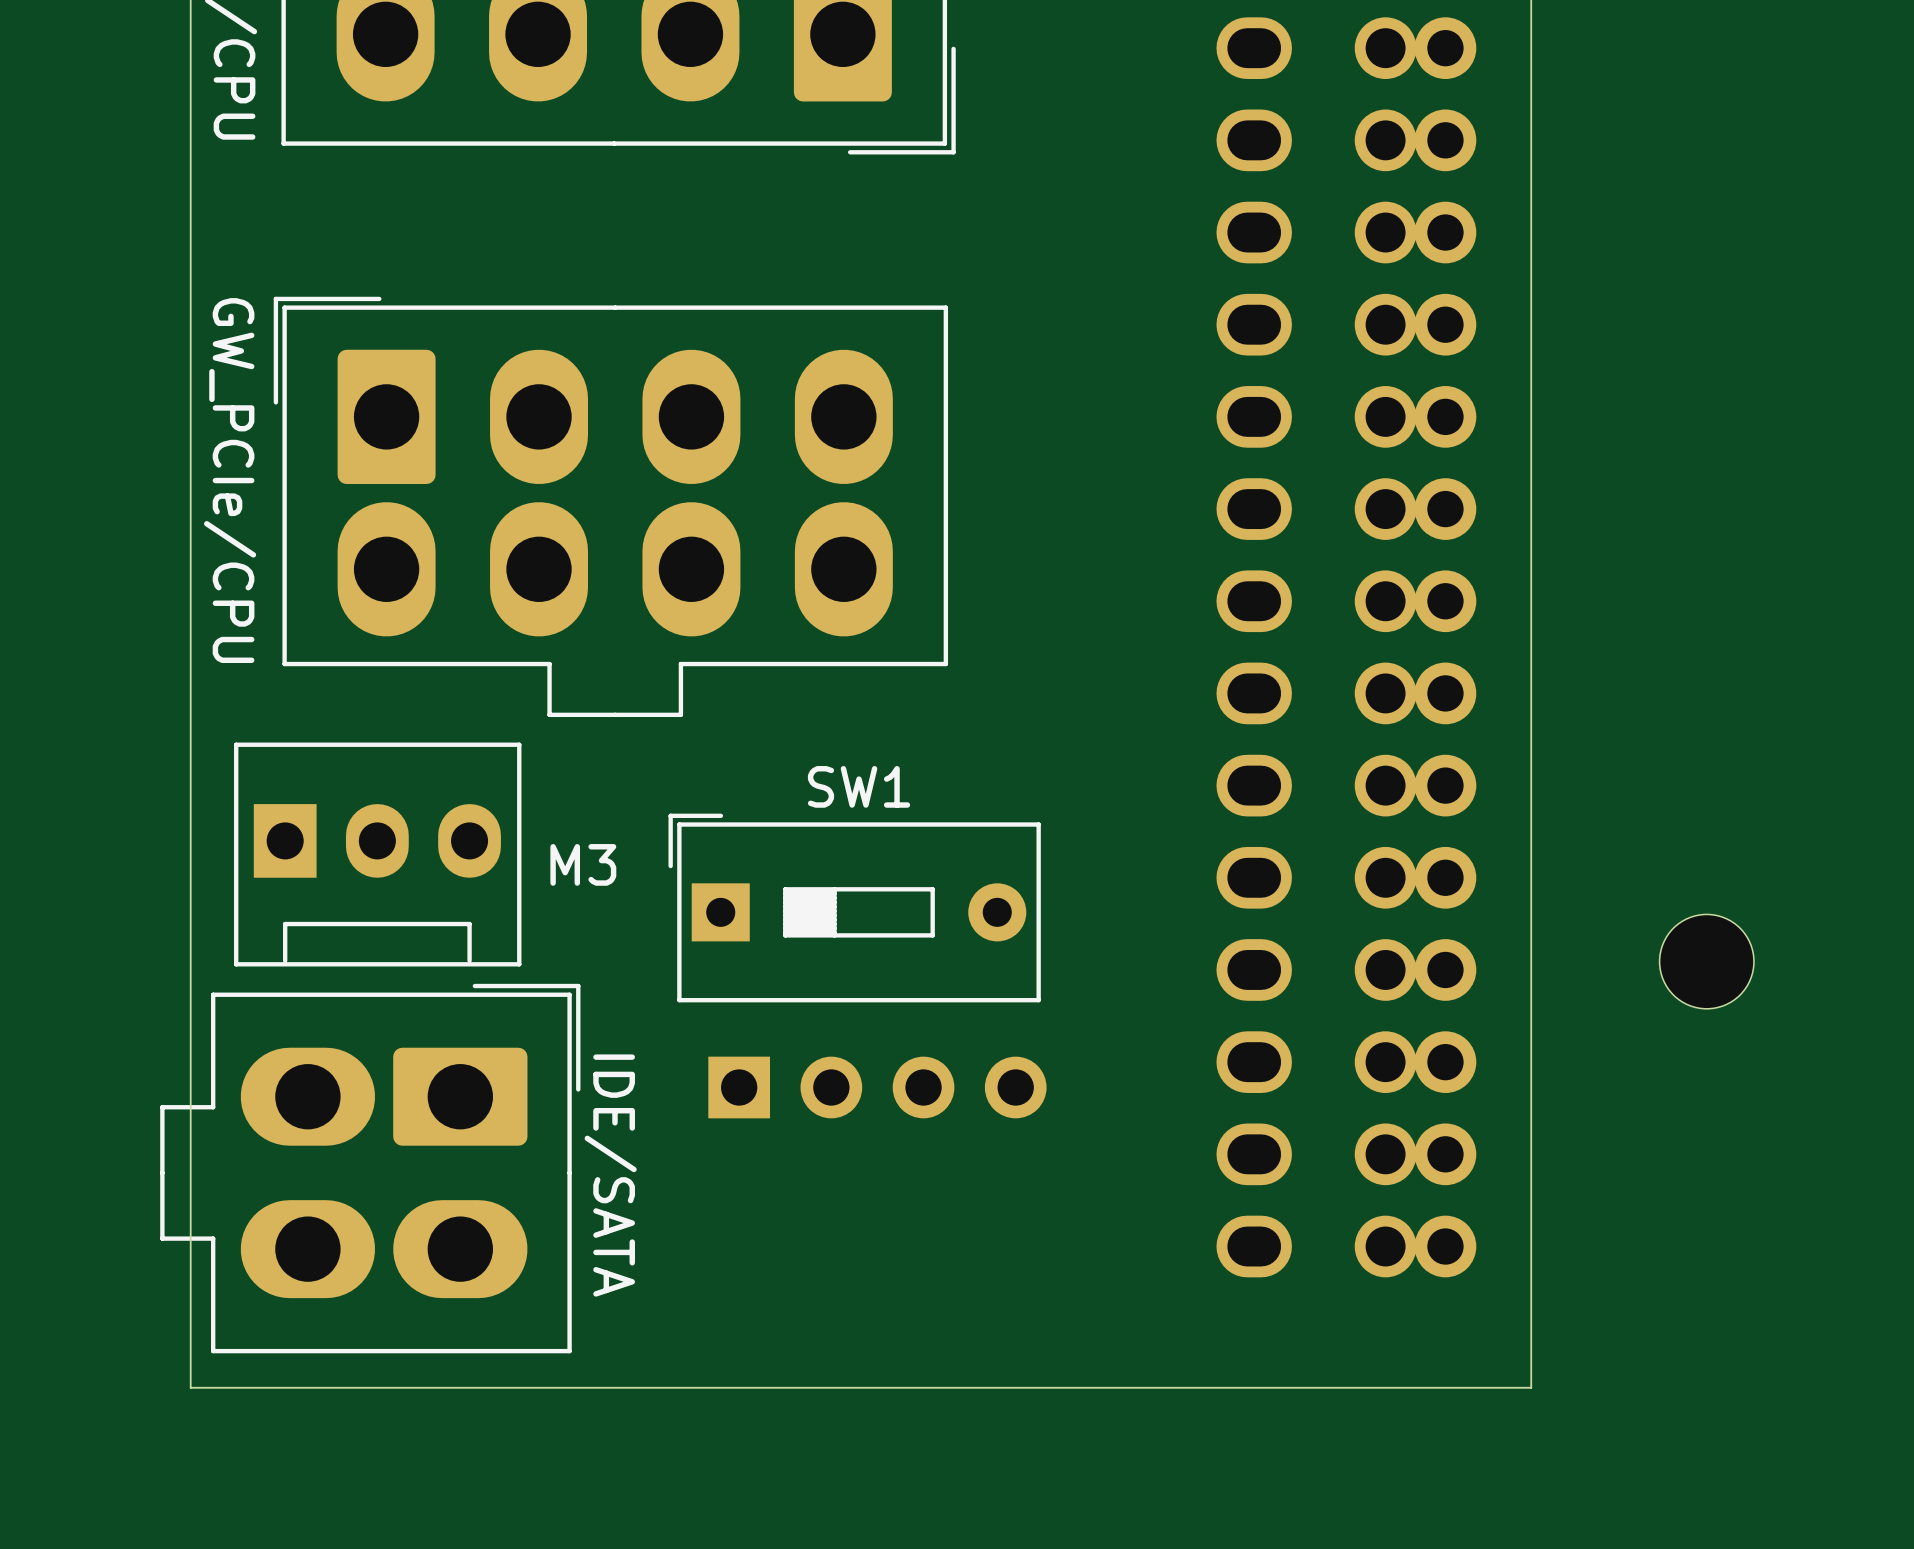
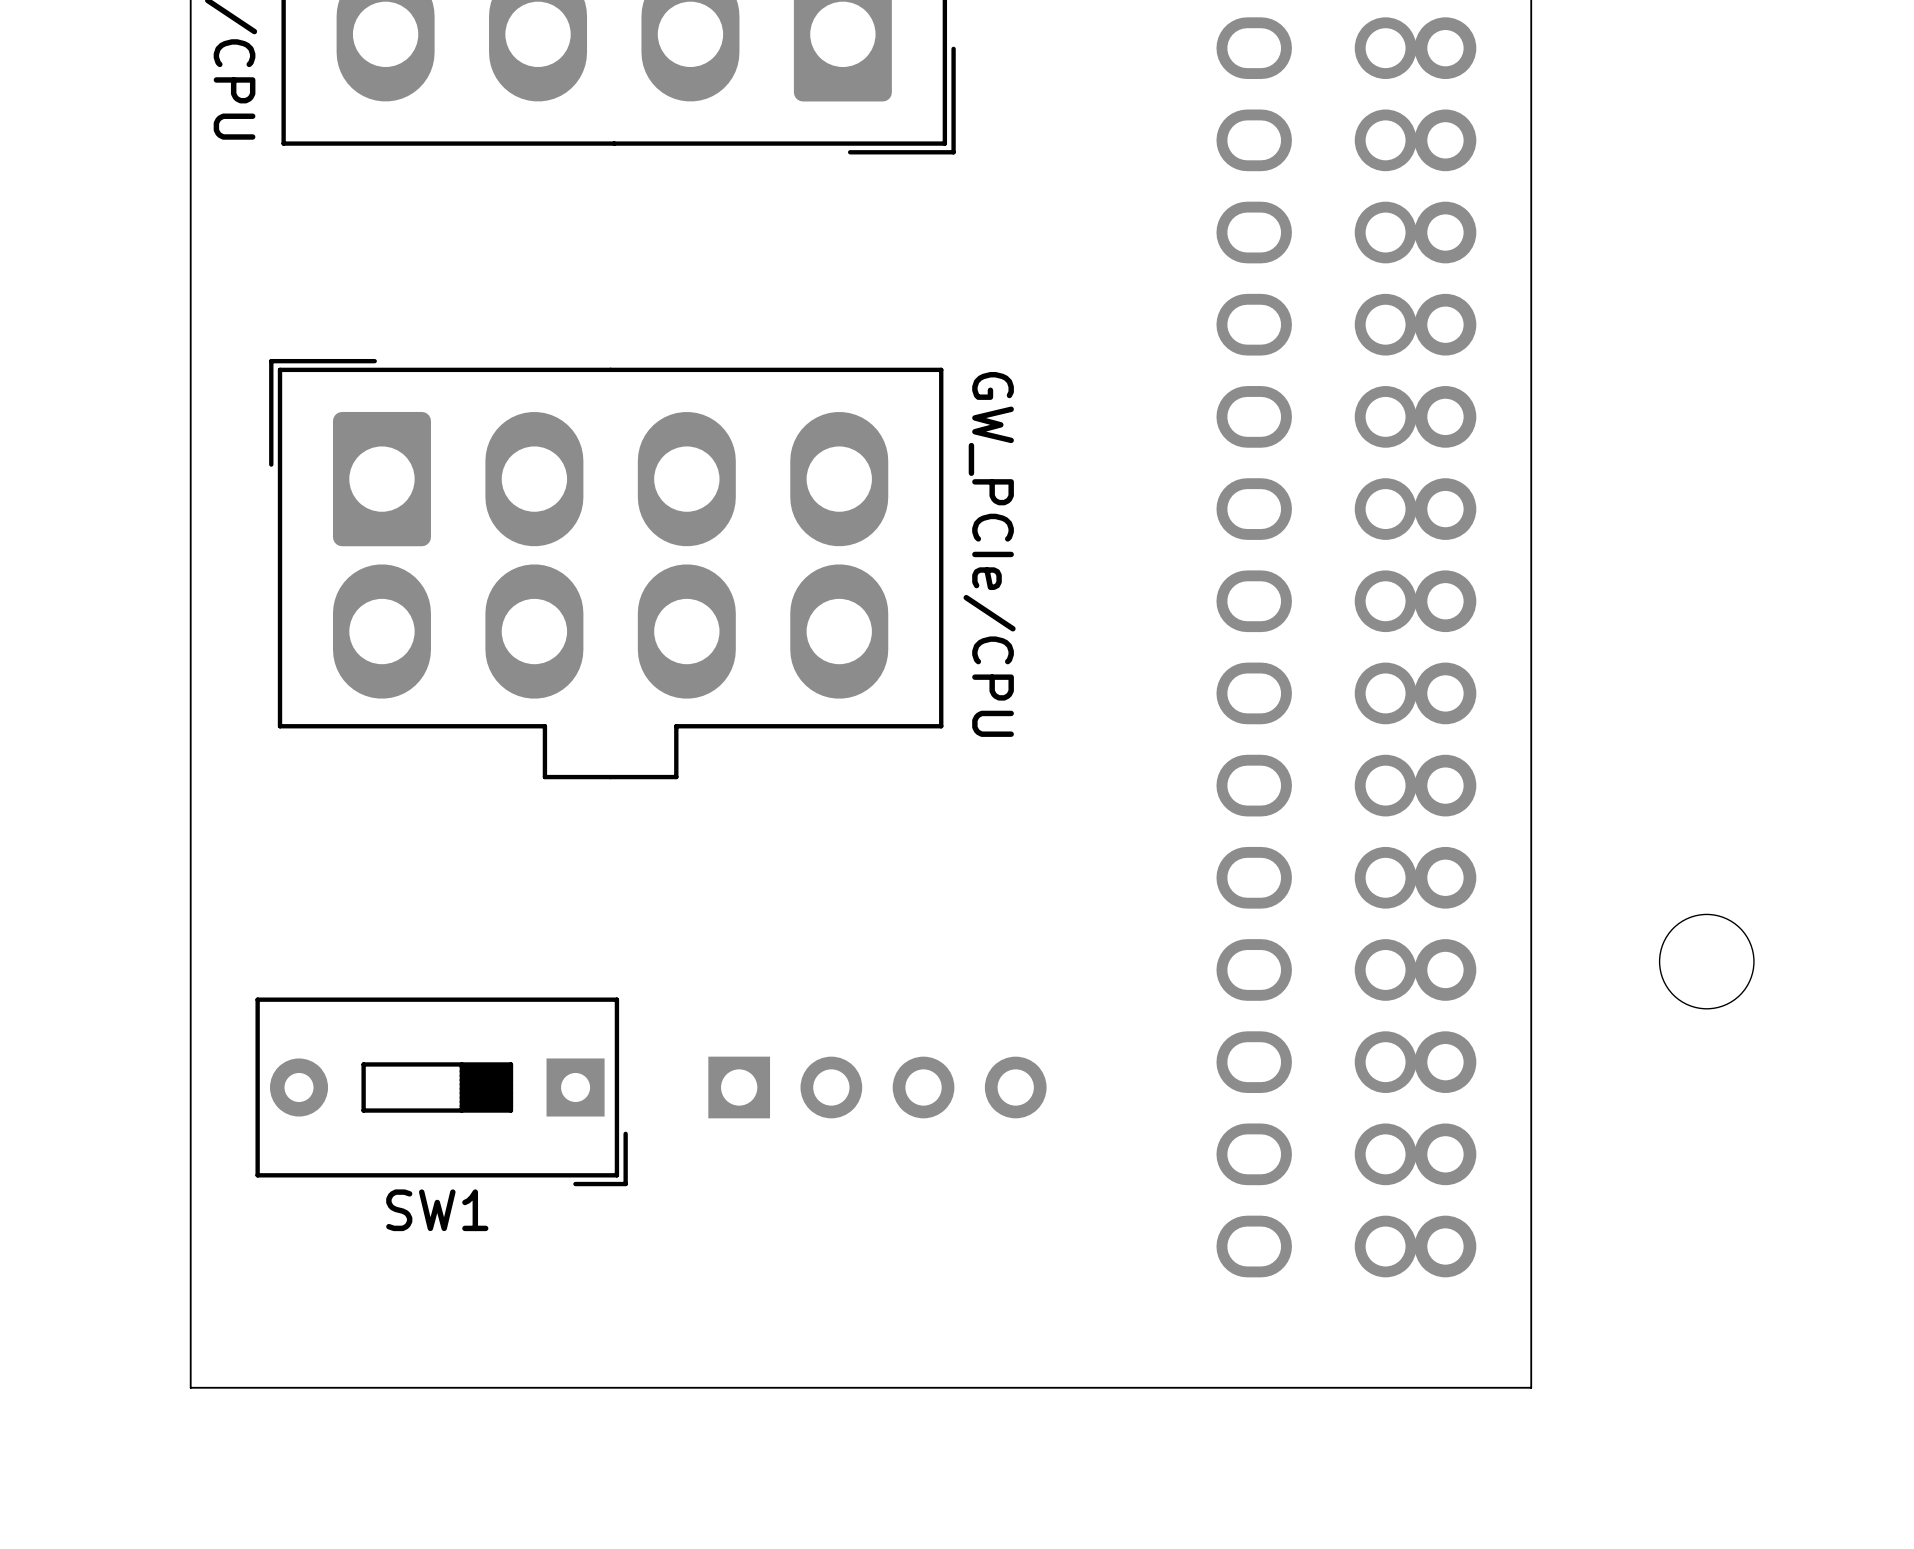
part value position: GW_PCIe/CPU (230, 480) -> GW_PCIe/CPU (989, 554)
part position: (610, 506) -> (606, 569)
M3: (377, 854) -> none
SW1 rotation: 0° (854, 908) -> 180° (441, 1091)
SW1 position: (854, 908) -> (441, 1091)
part: IDE/SATA (370, 1168) -> none

